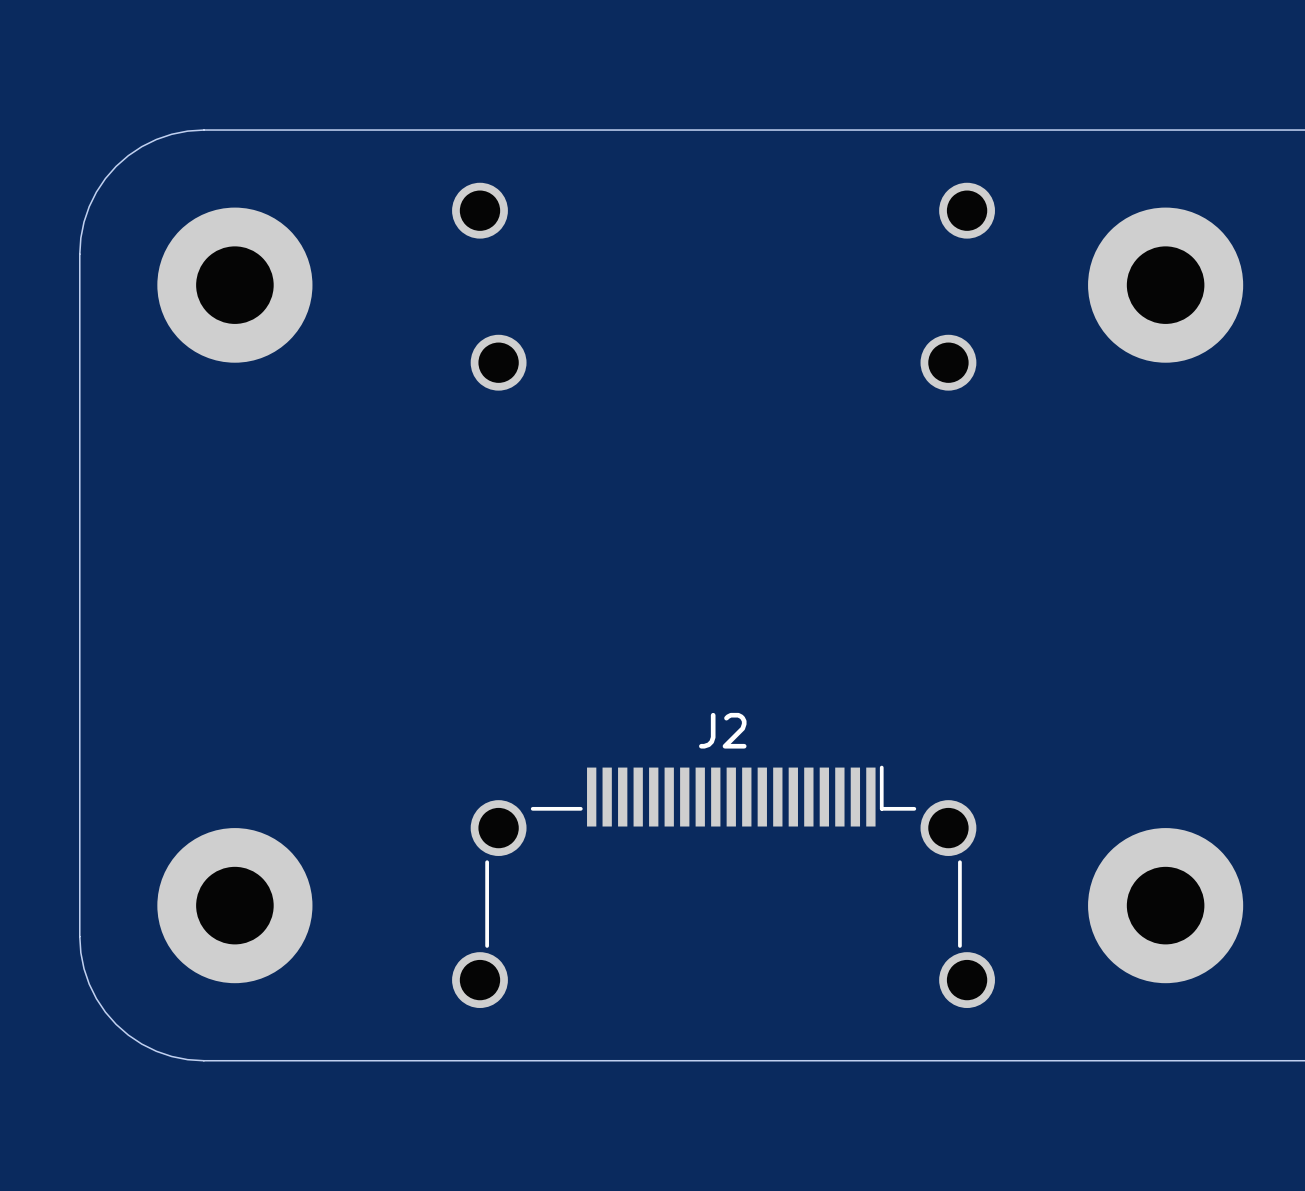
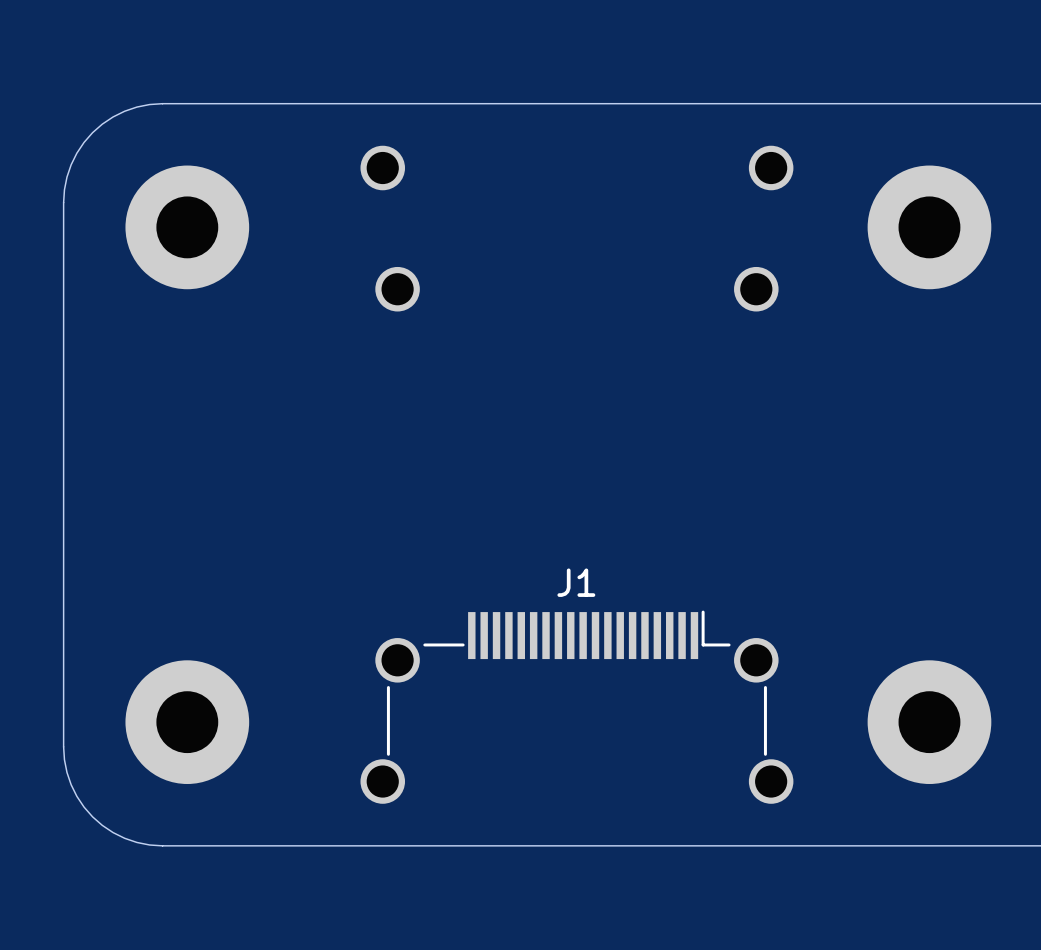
J2 name: J2 (722, 730) -> J1 (576, 582)

